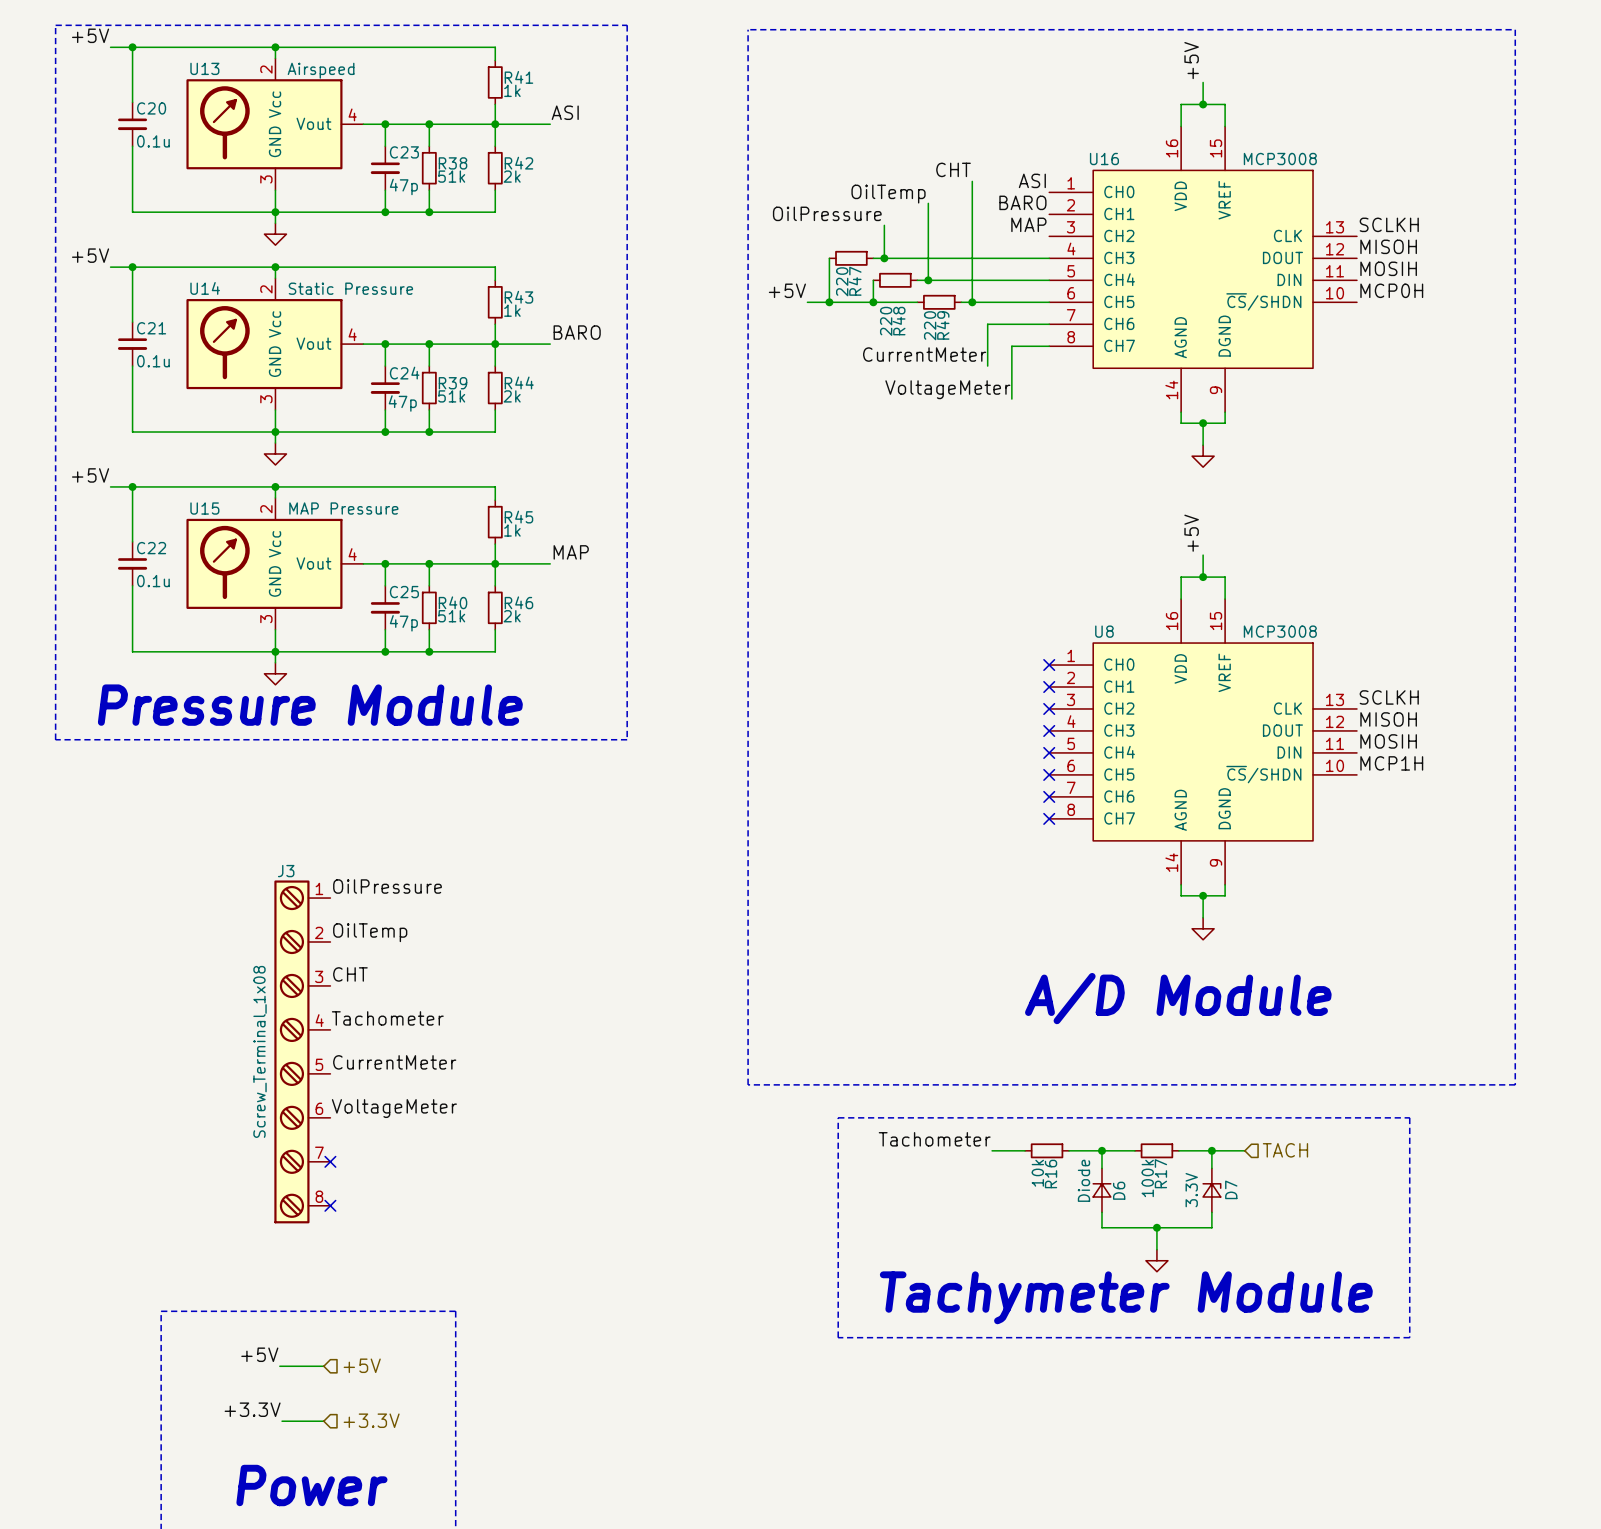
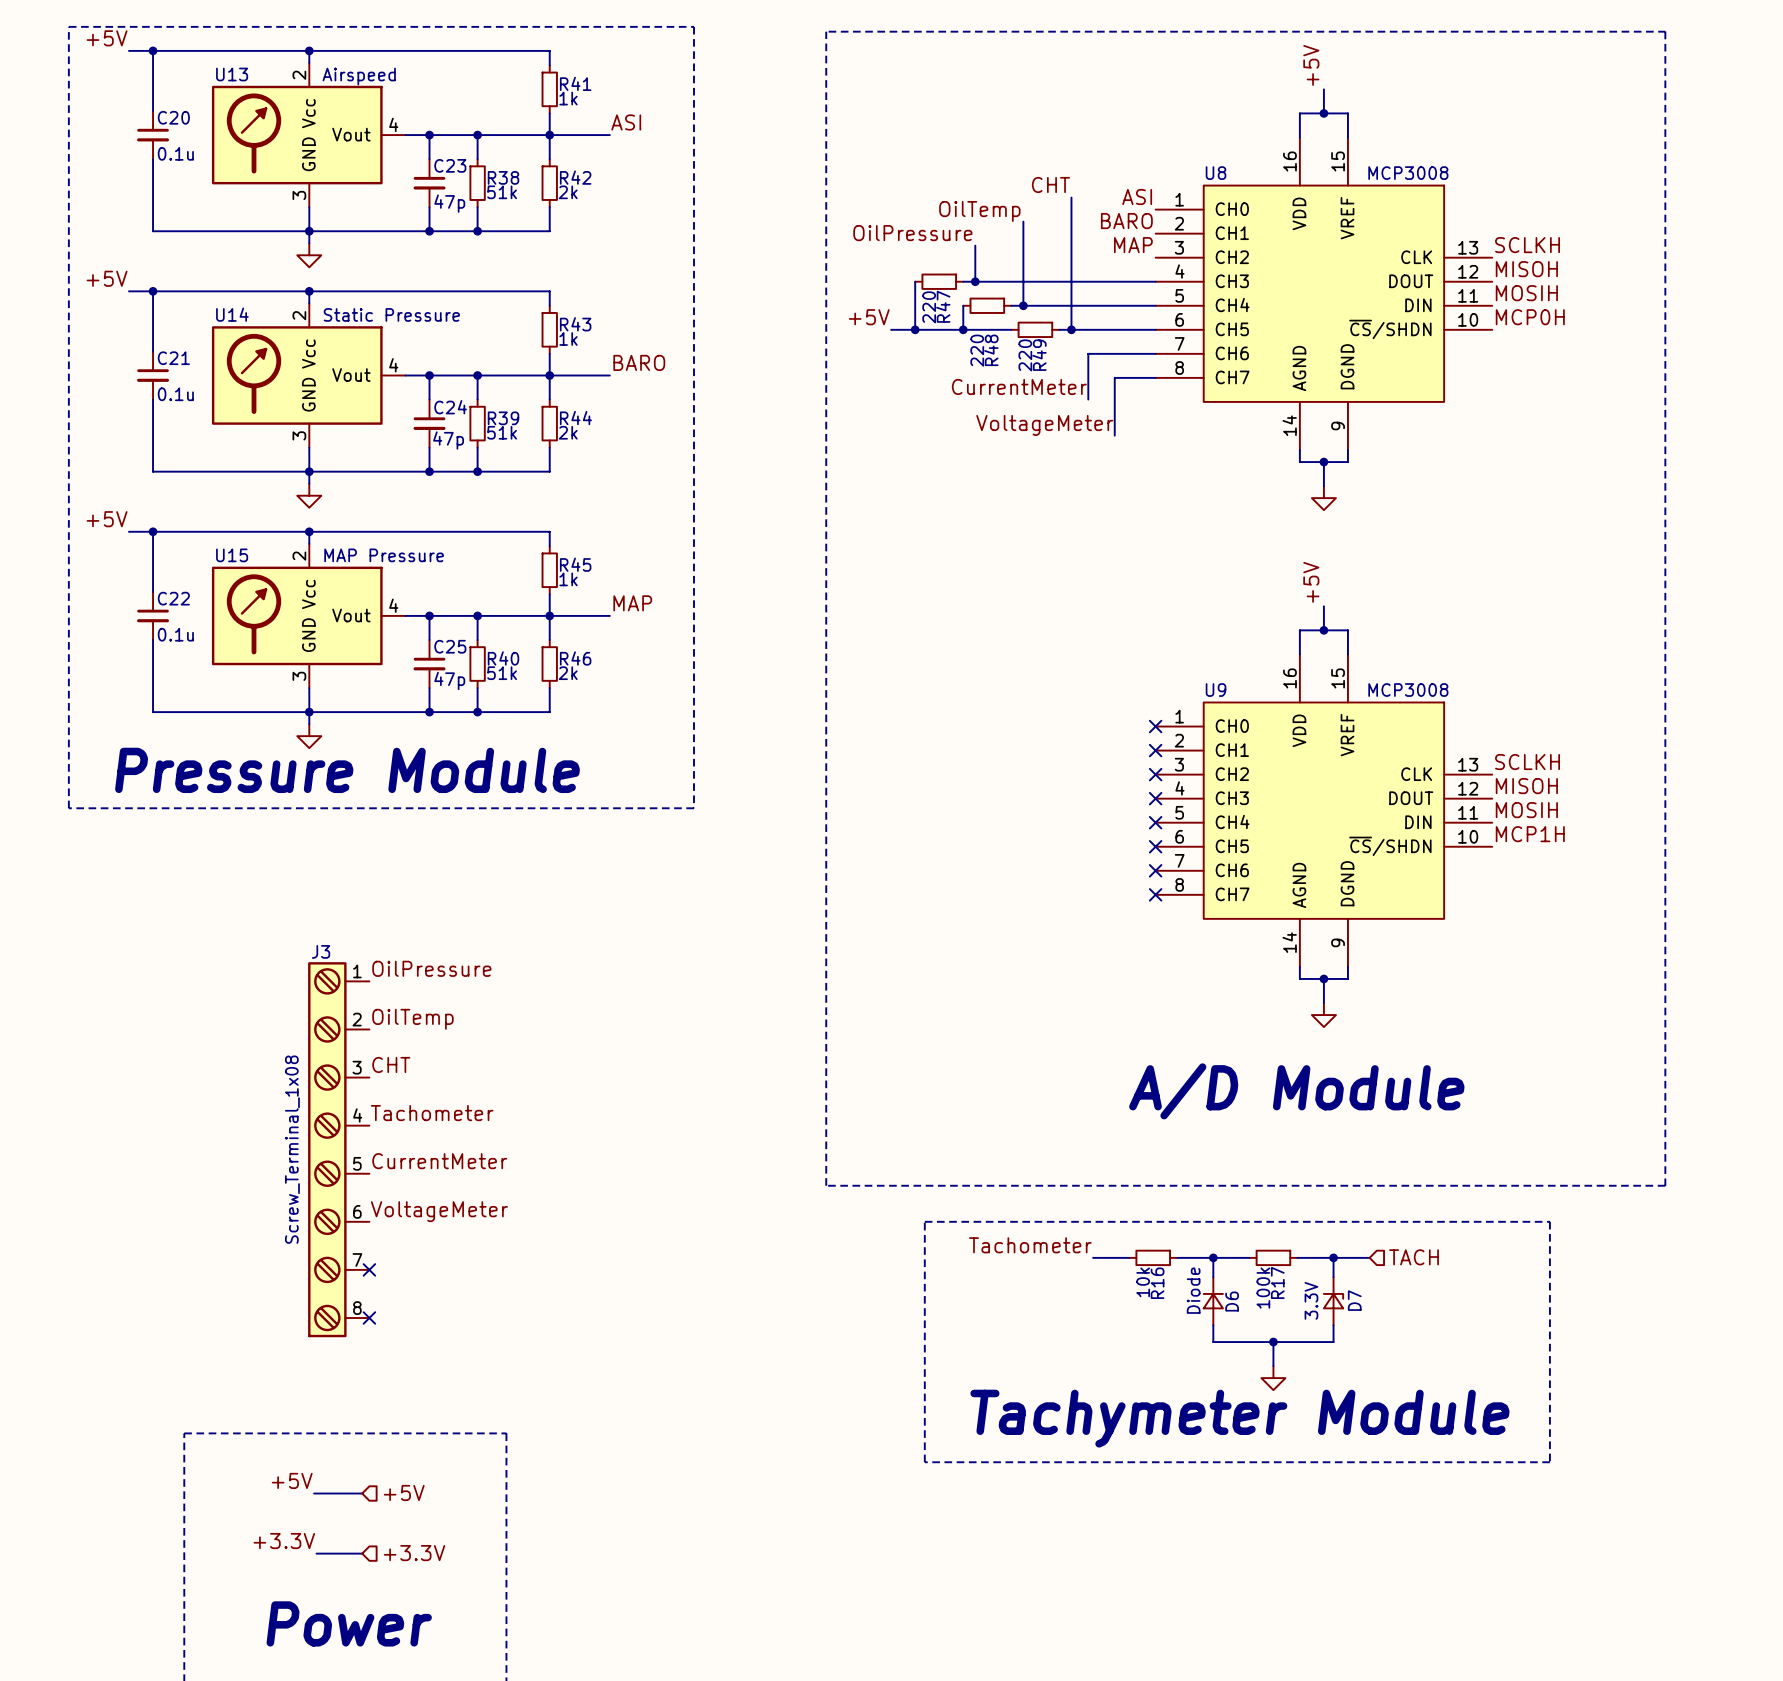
U16 name: U16 (1104, 159) -> U8 (1216, 173)
U8 name: U8 (1104, 631) -> U9 (1216, 690)

